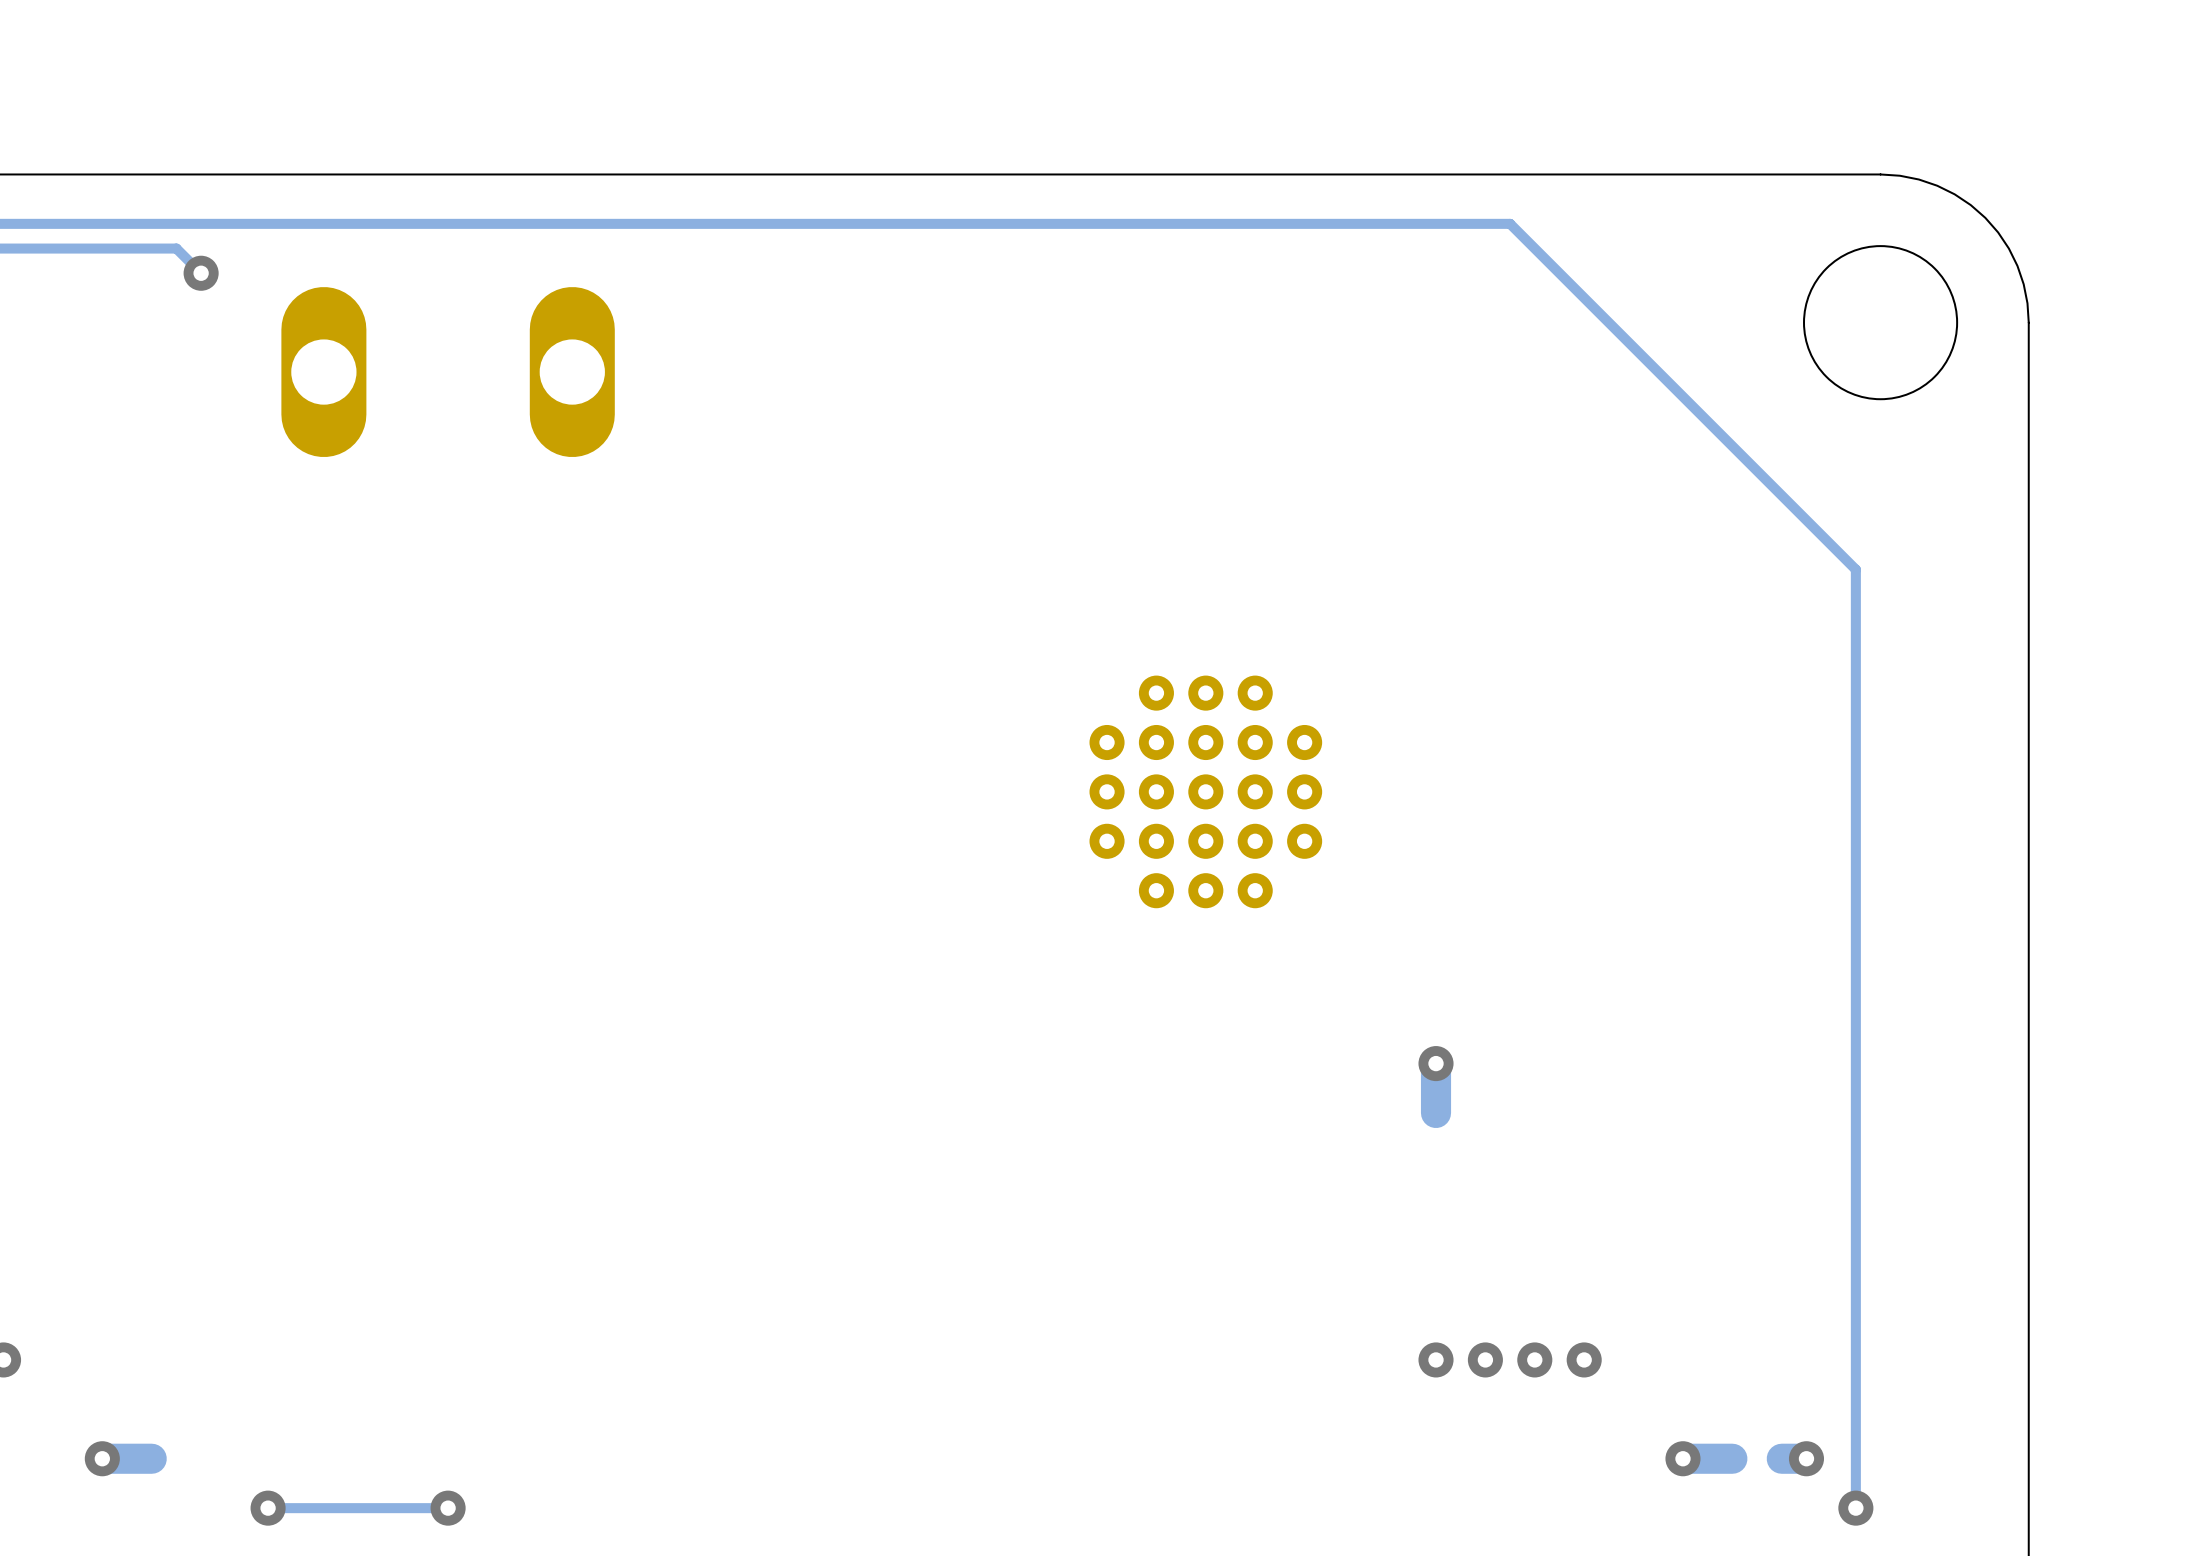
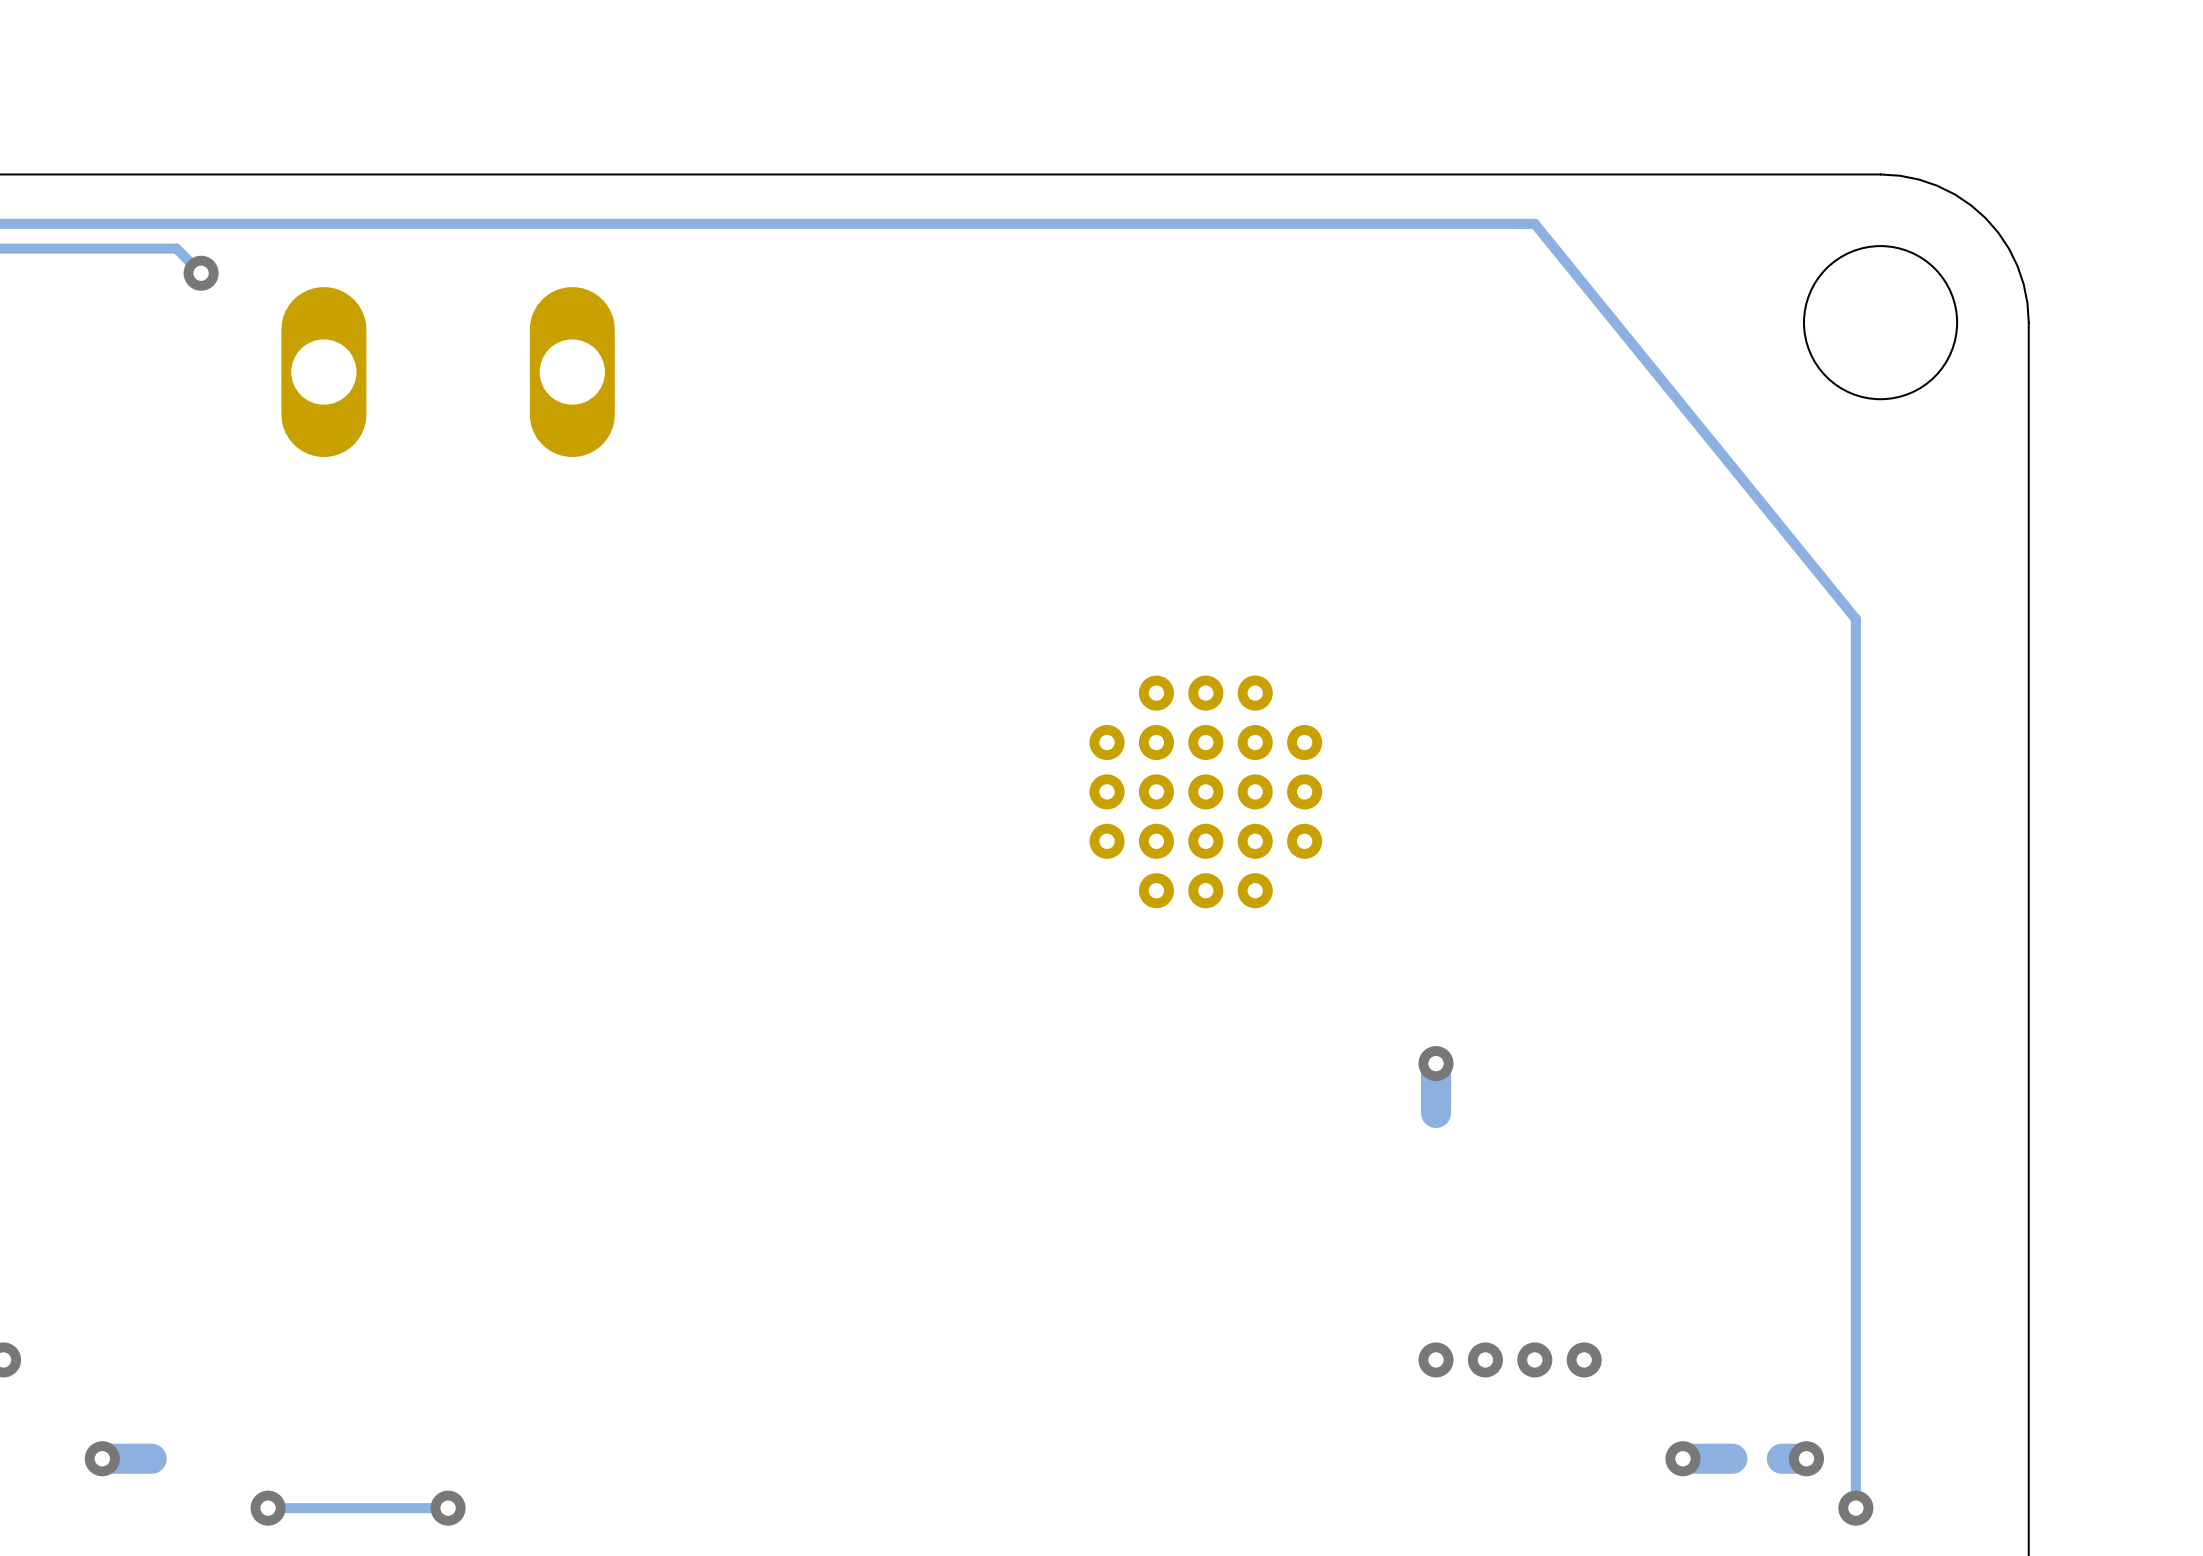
track: (1510, 223) (1855, 569) (1855, 619) -> (1510, 223) (1534, 223) (1855, 619)

